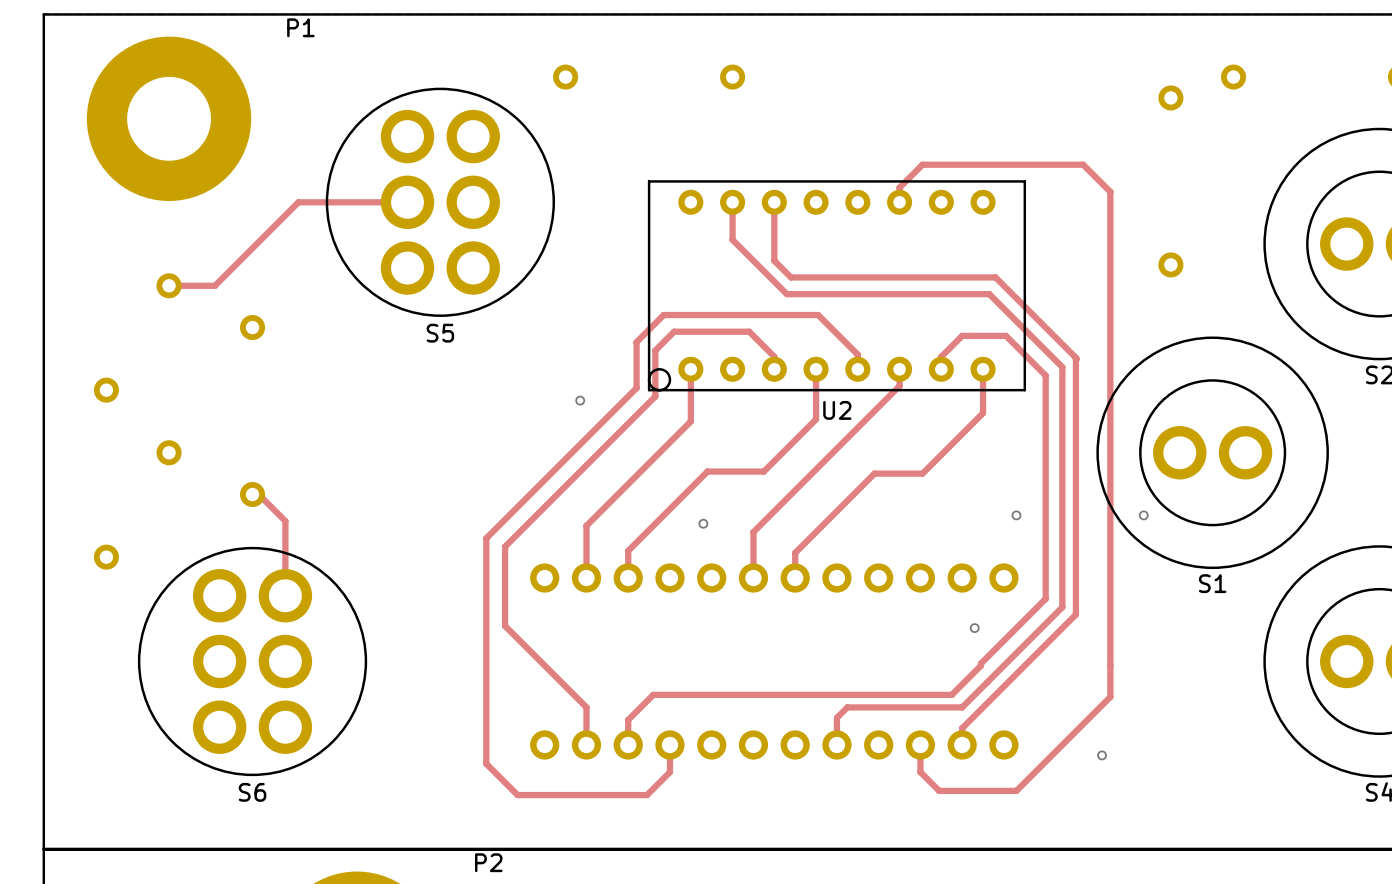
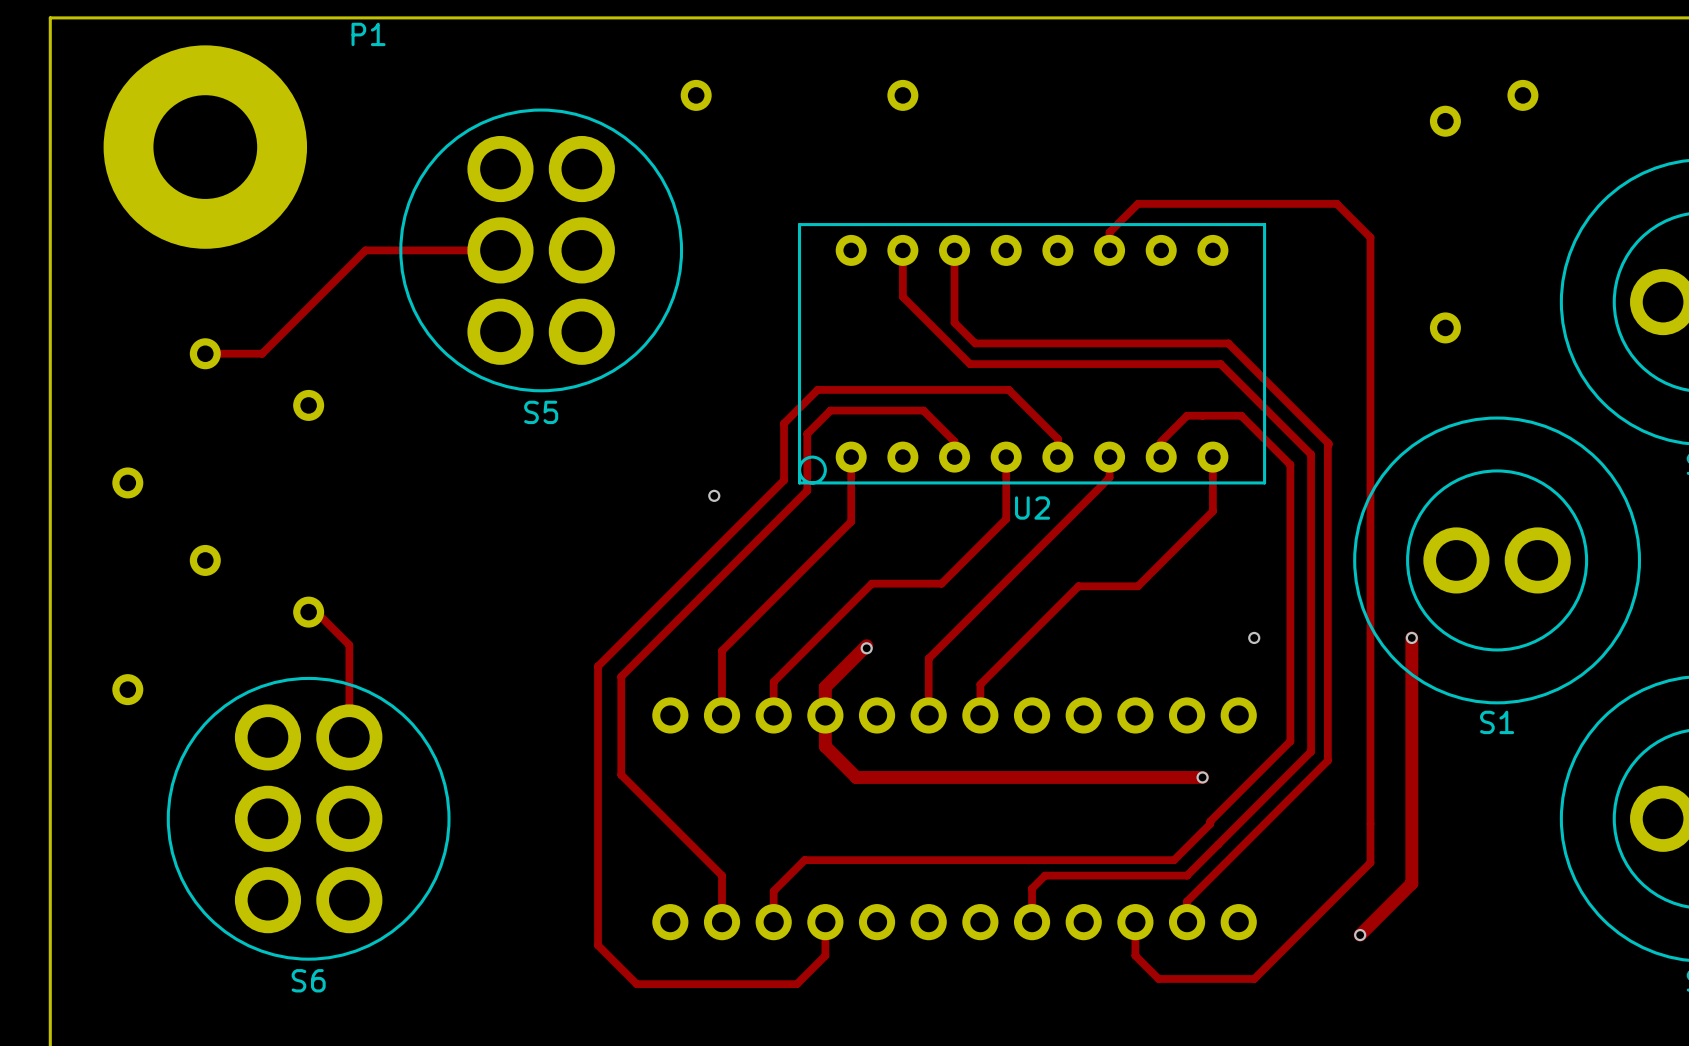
track: none -> (1411, 637) (1411, 883) (1360, 935)
track: none -> (866, 645) (825, 687) (825, 746) (856, 777) (1202, 777)

